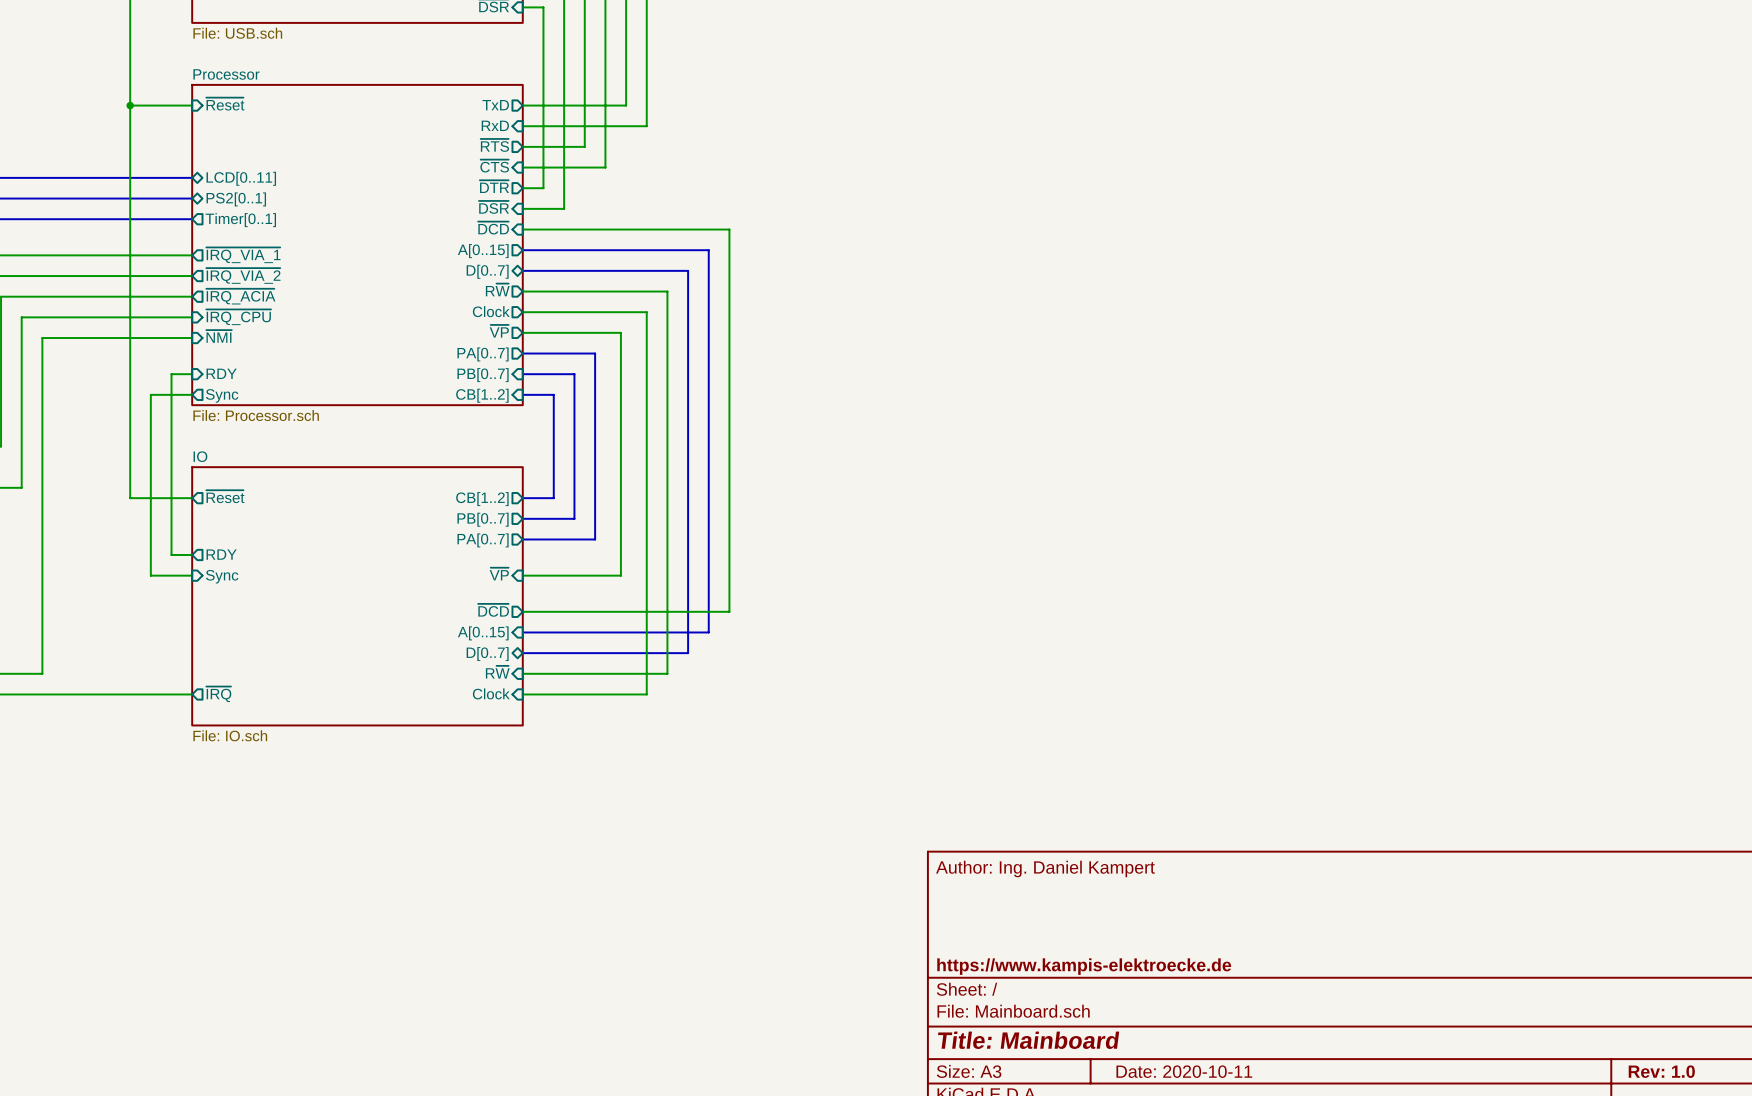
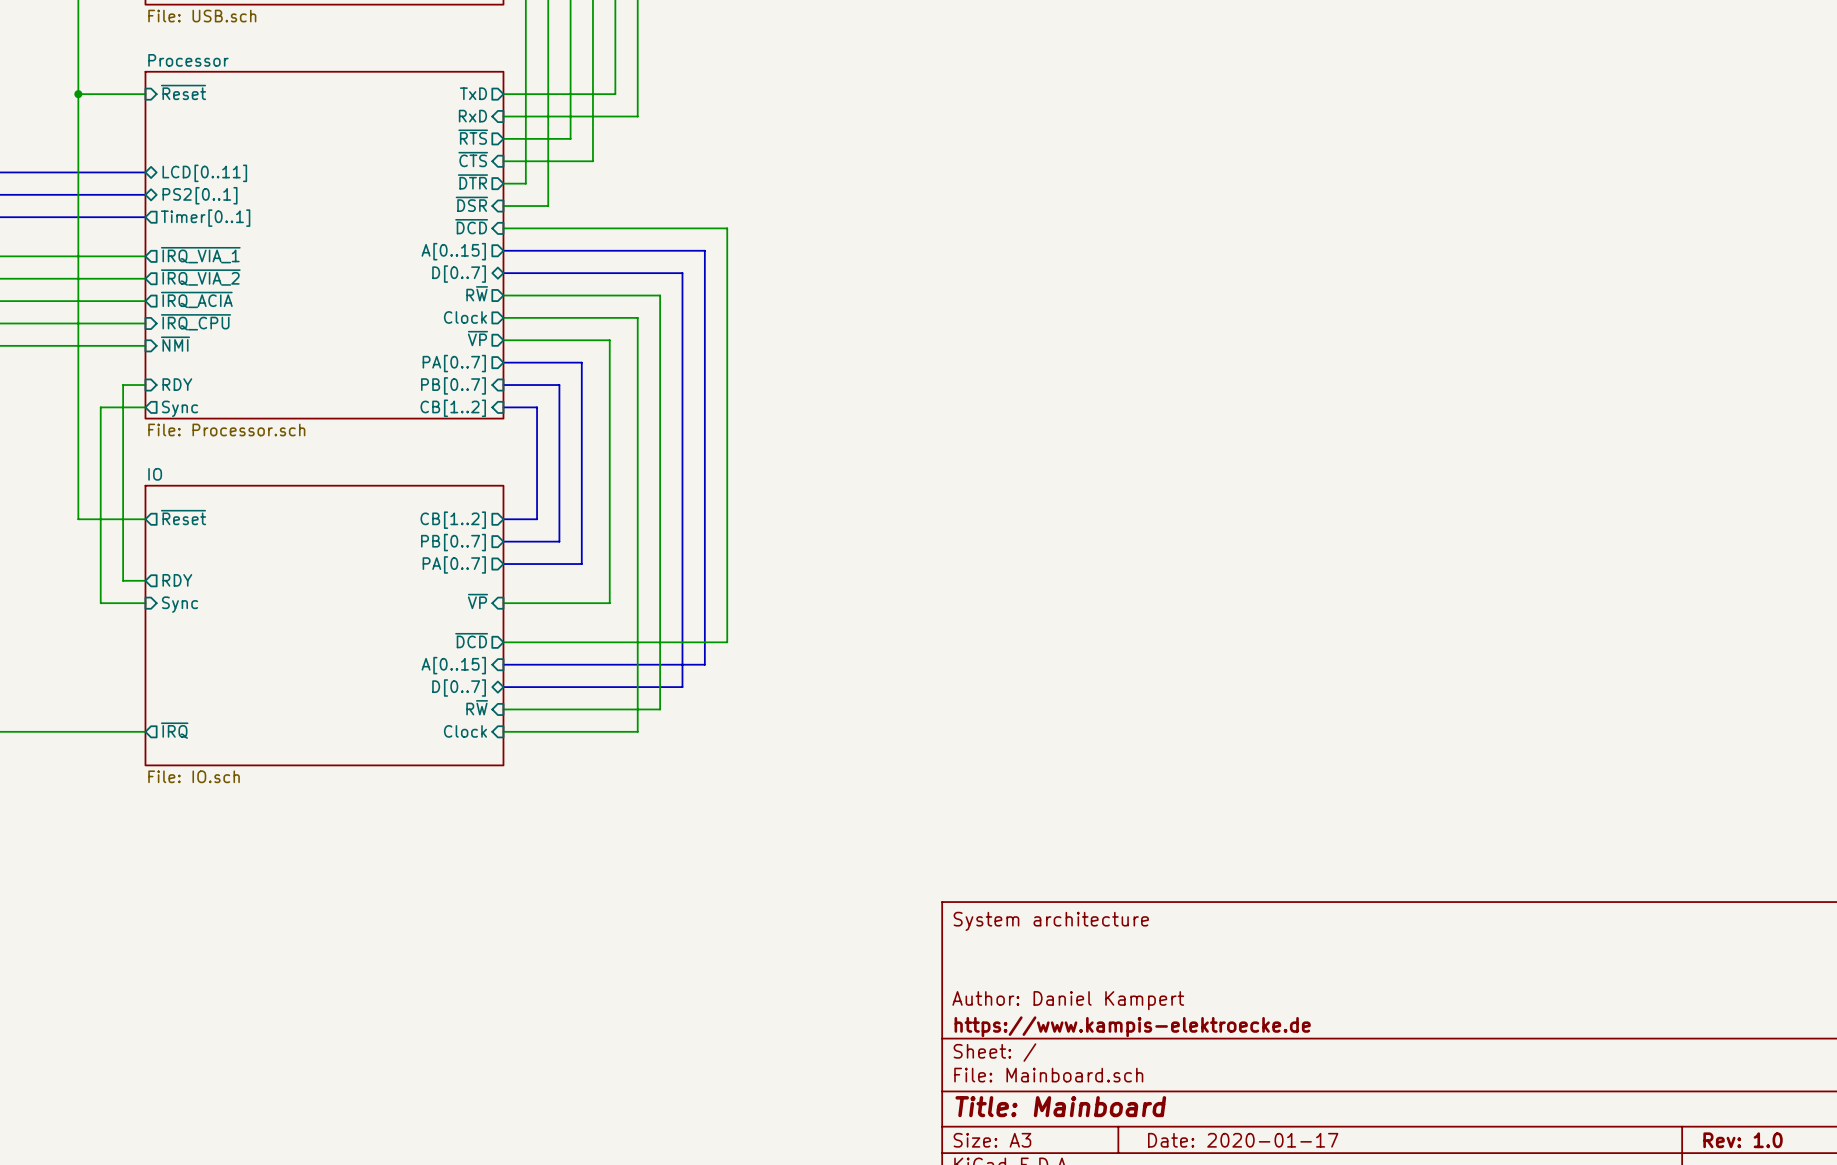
title block: Author: Ing. Daniel Kampert (1045, 868) -> System architecture (1051, 921)
title block: none -> Author: Daniel Kampert (1068, 1000)
title block: Date: 2020-10-11 (1184, 1071) -> Date: 2020-01-17 (1243, 1140)

